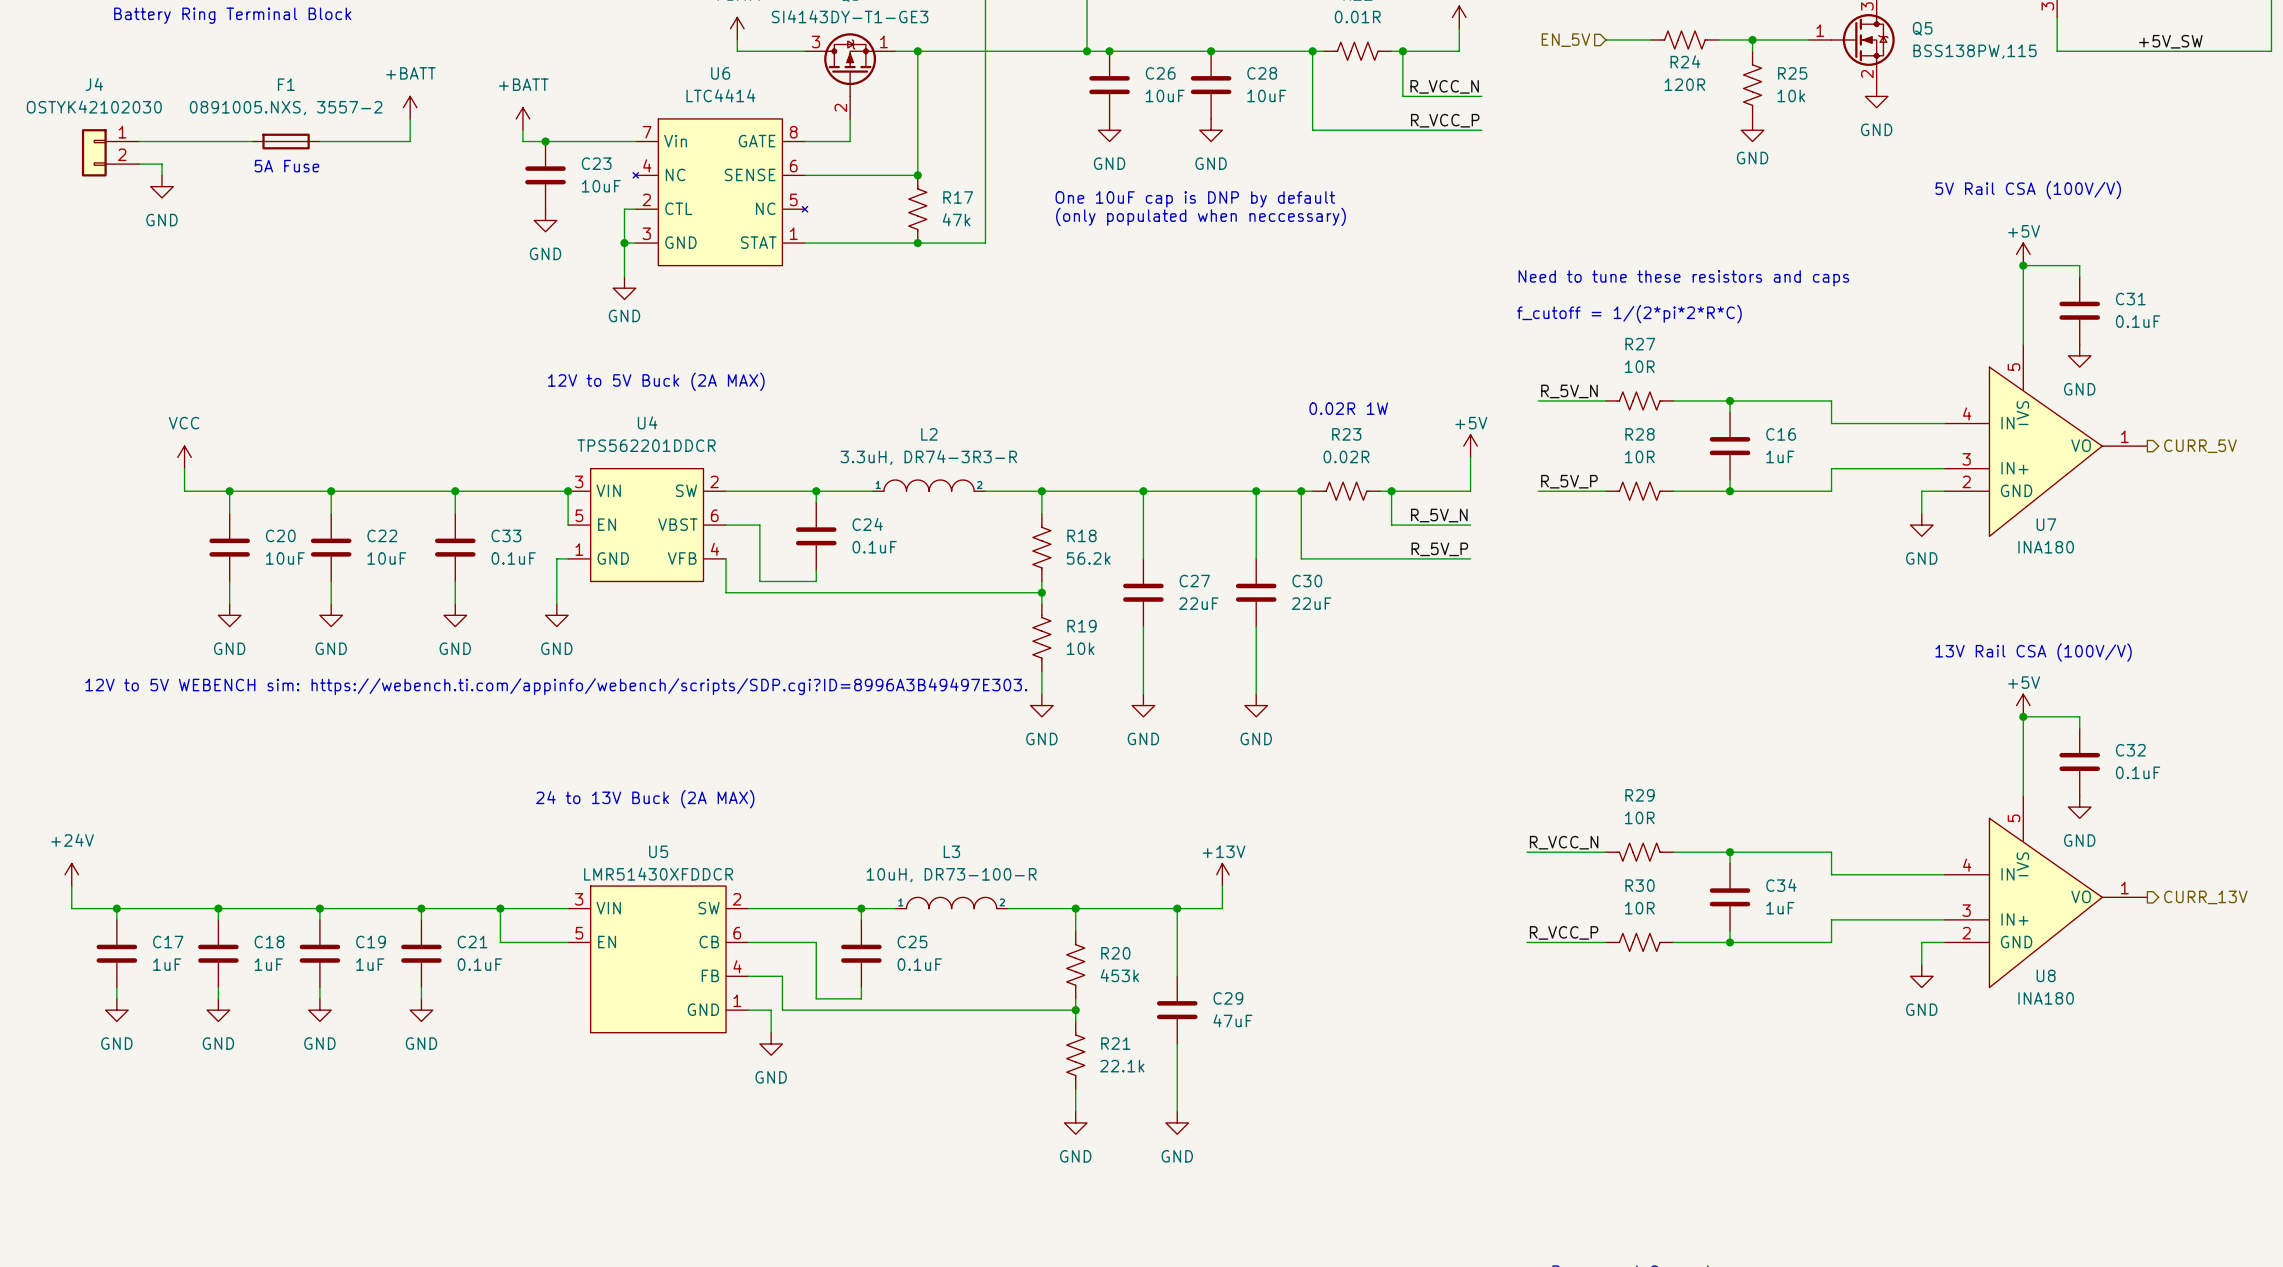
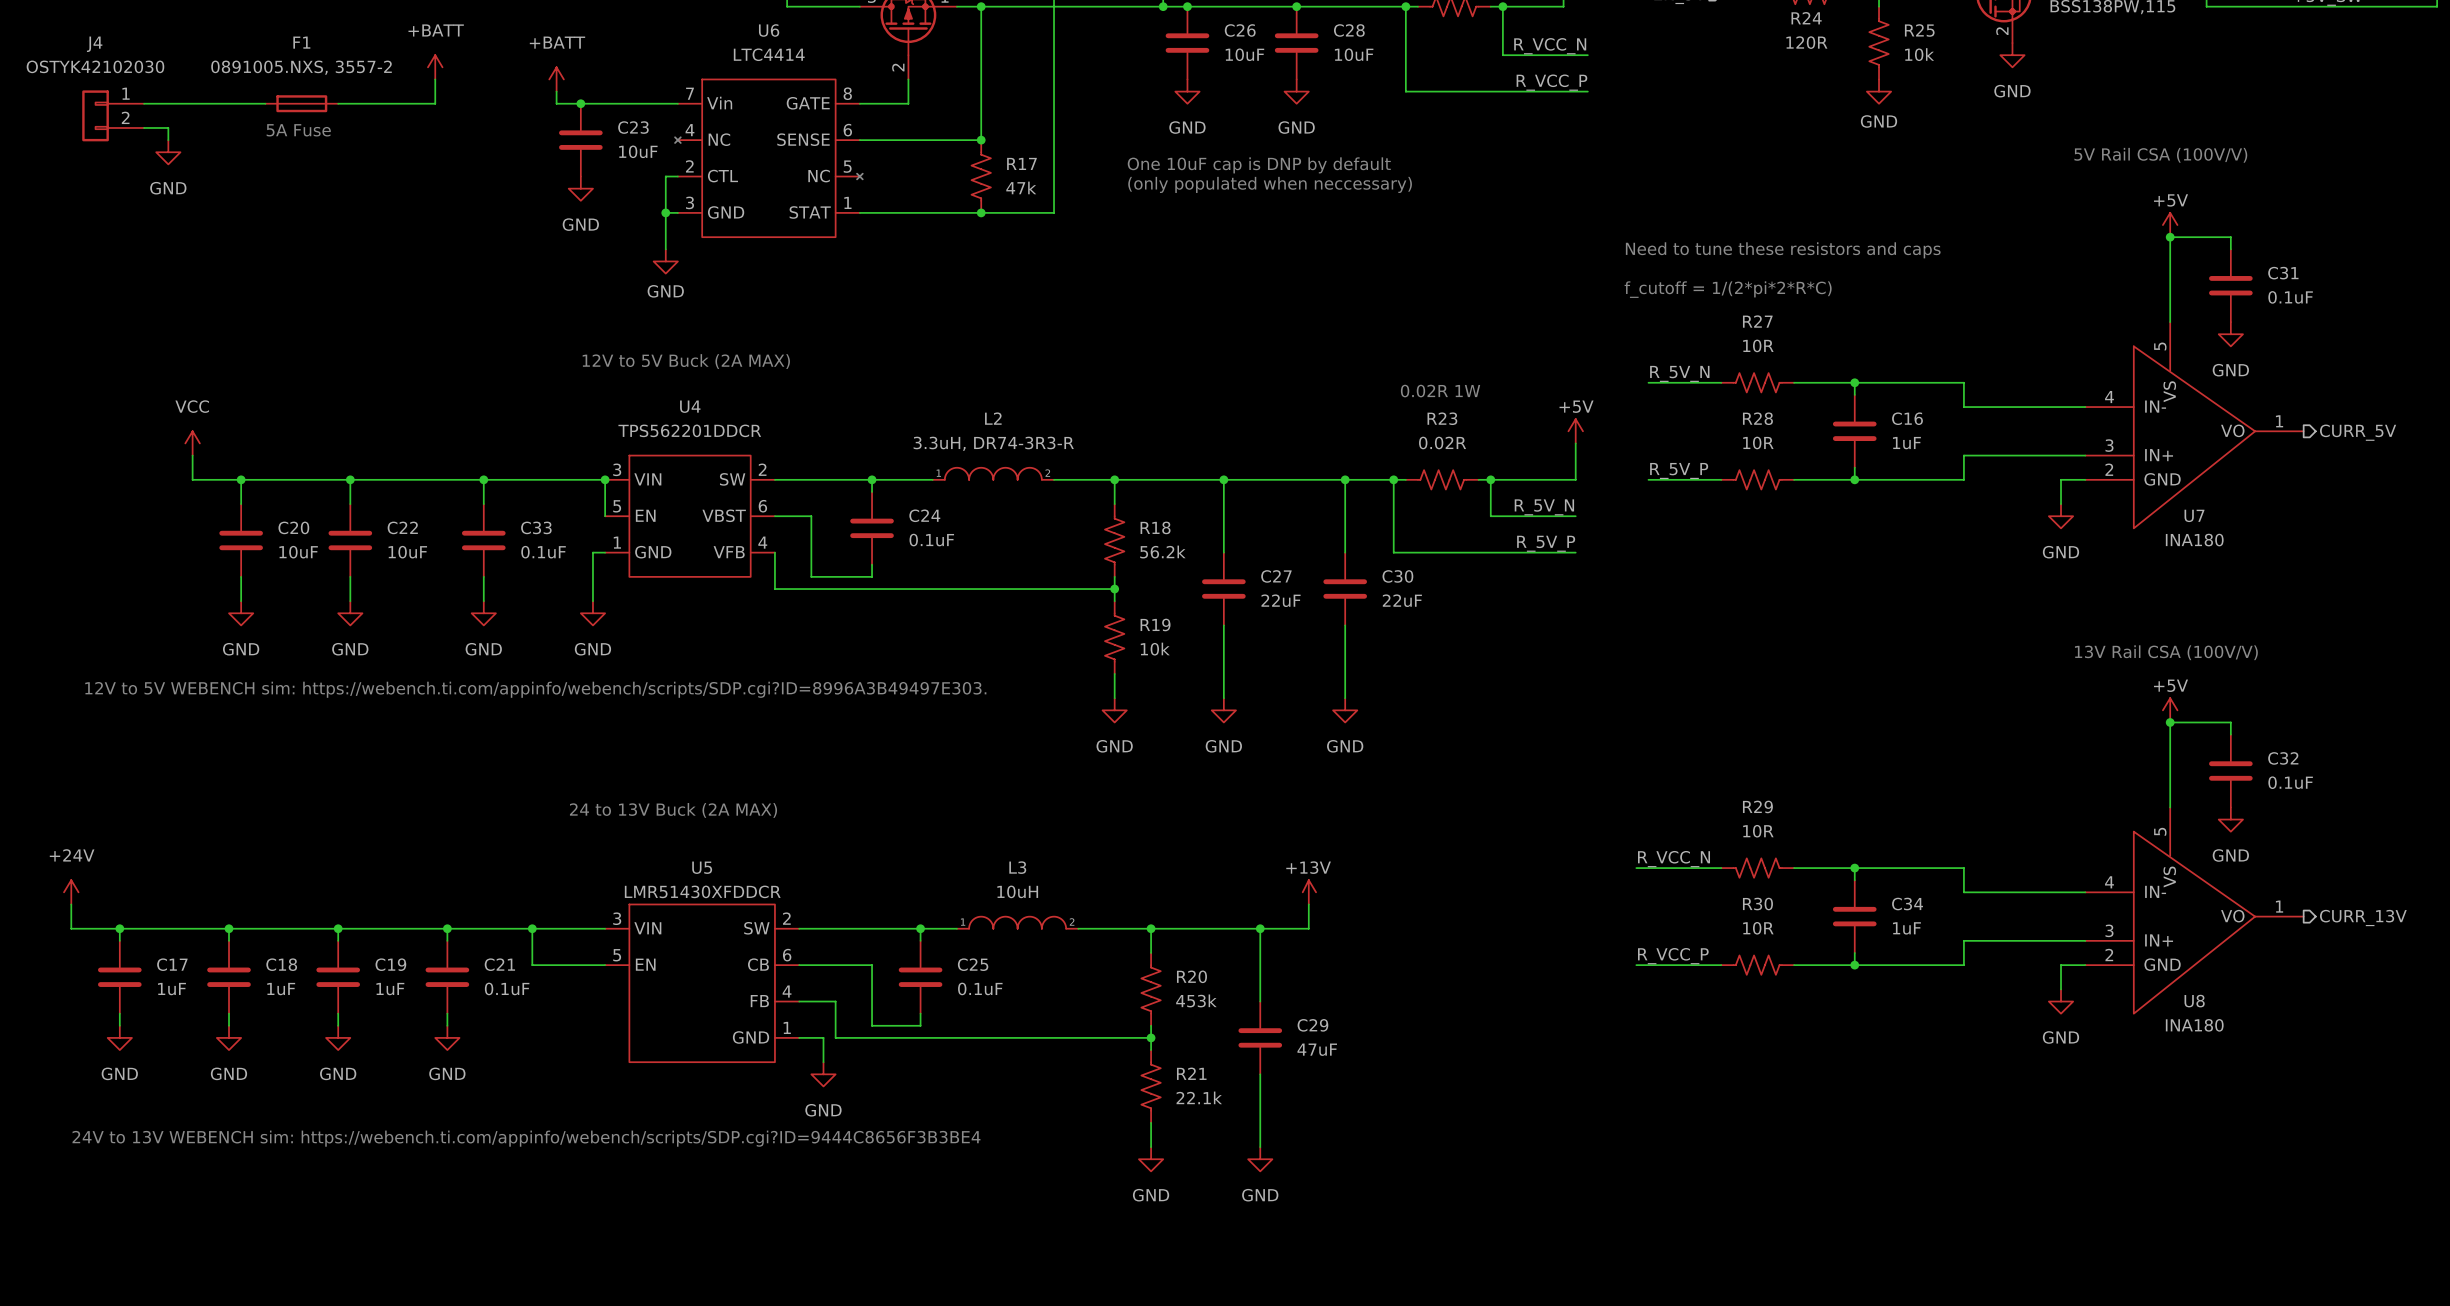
L3 value: 10uH, DR73-100-R (951, 875) -> 10uH (1017, 891)
text: none -> 24V to 13V WEBENCH sim: https://webench.ti.com/appinfo/webench/scripts/SDP.cgi?ID=9444C8656F3B3BE4 (526, 1138)

